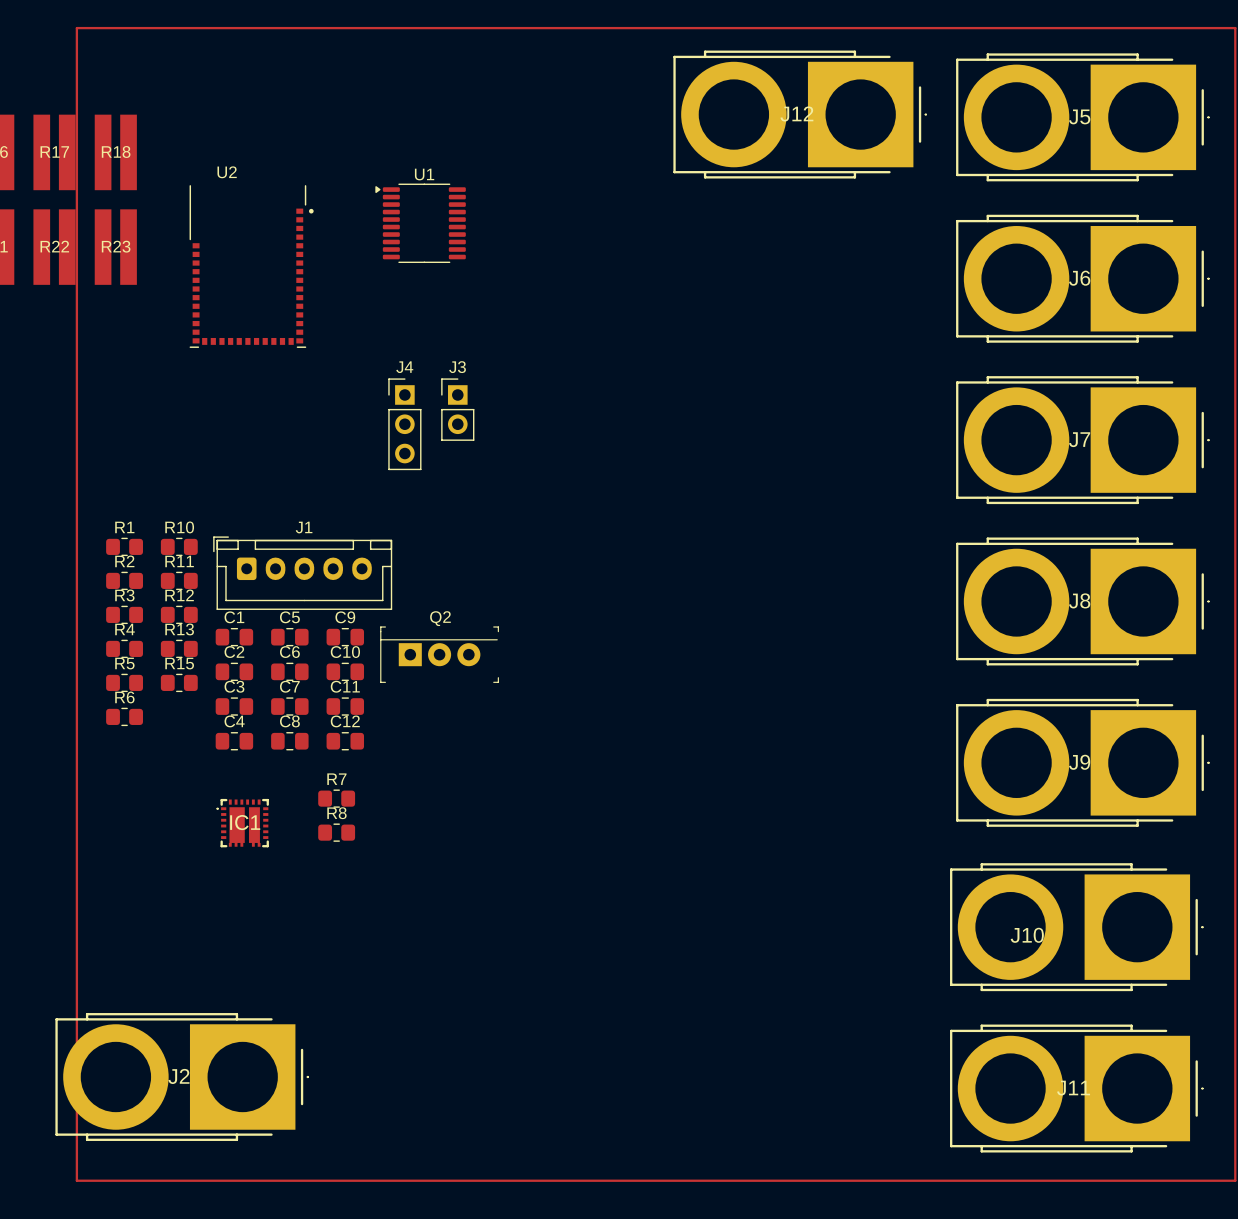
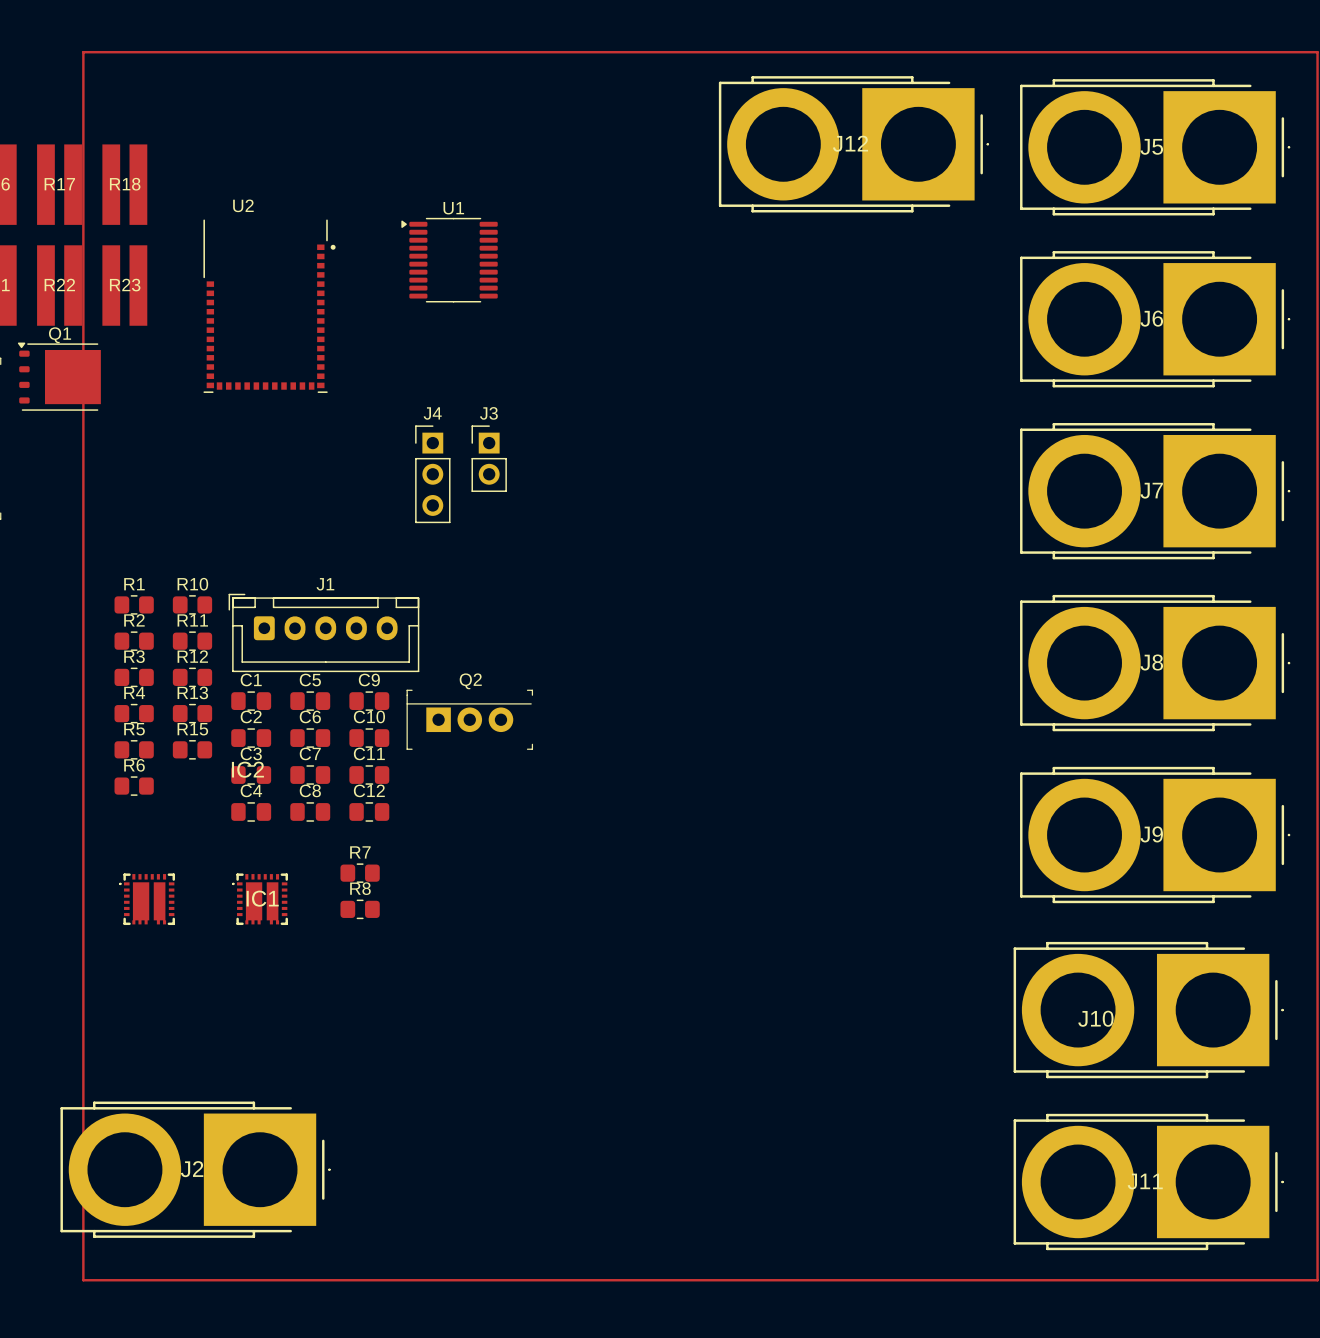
Q1: none -> (59, 376)
IC2: none -> (147, 899)

